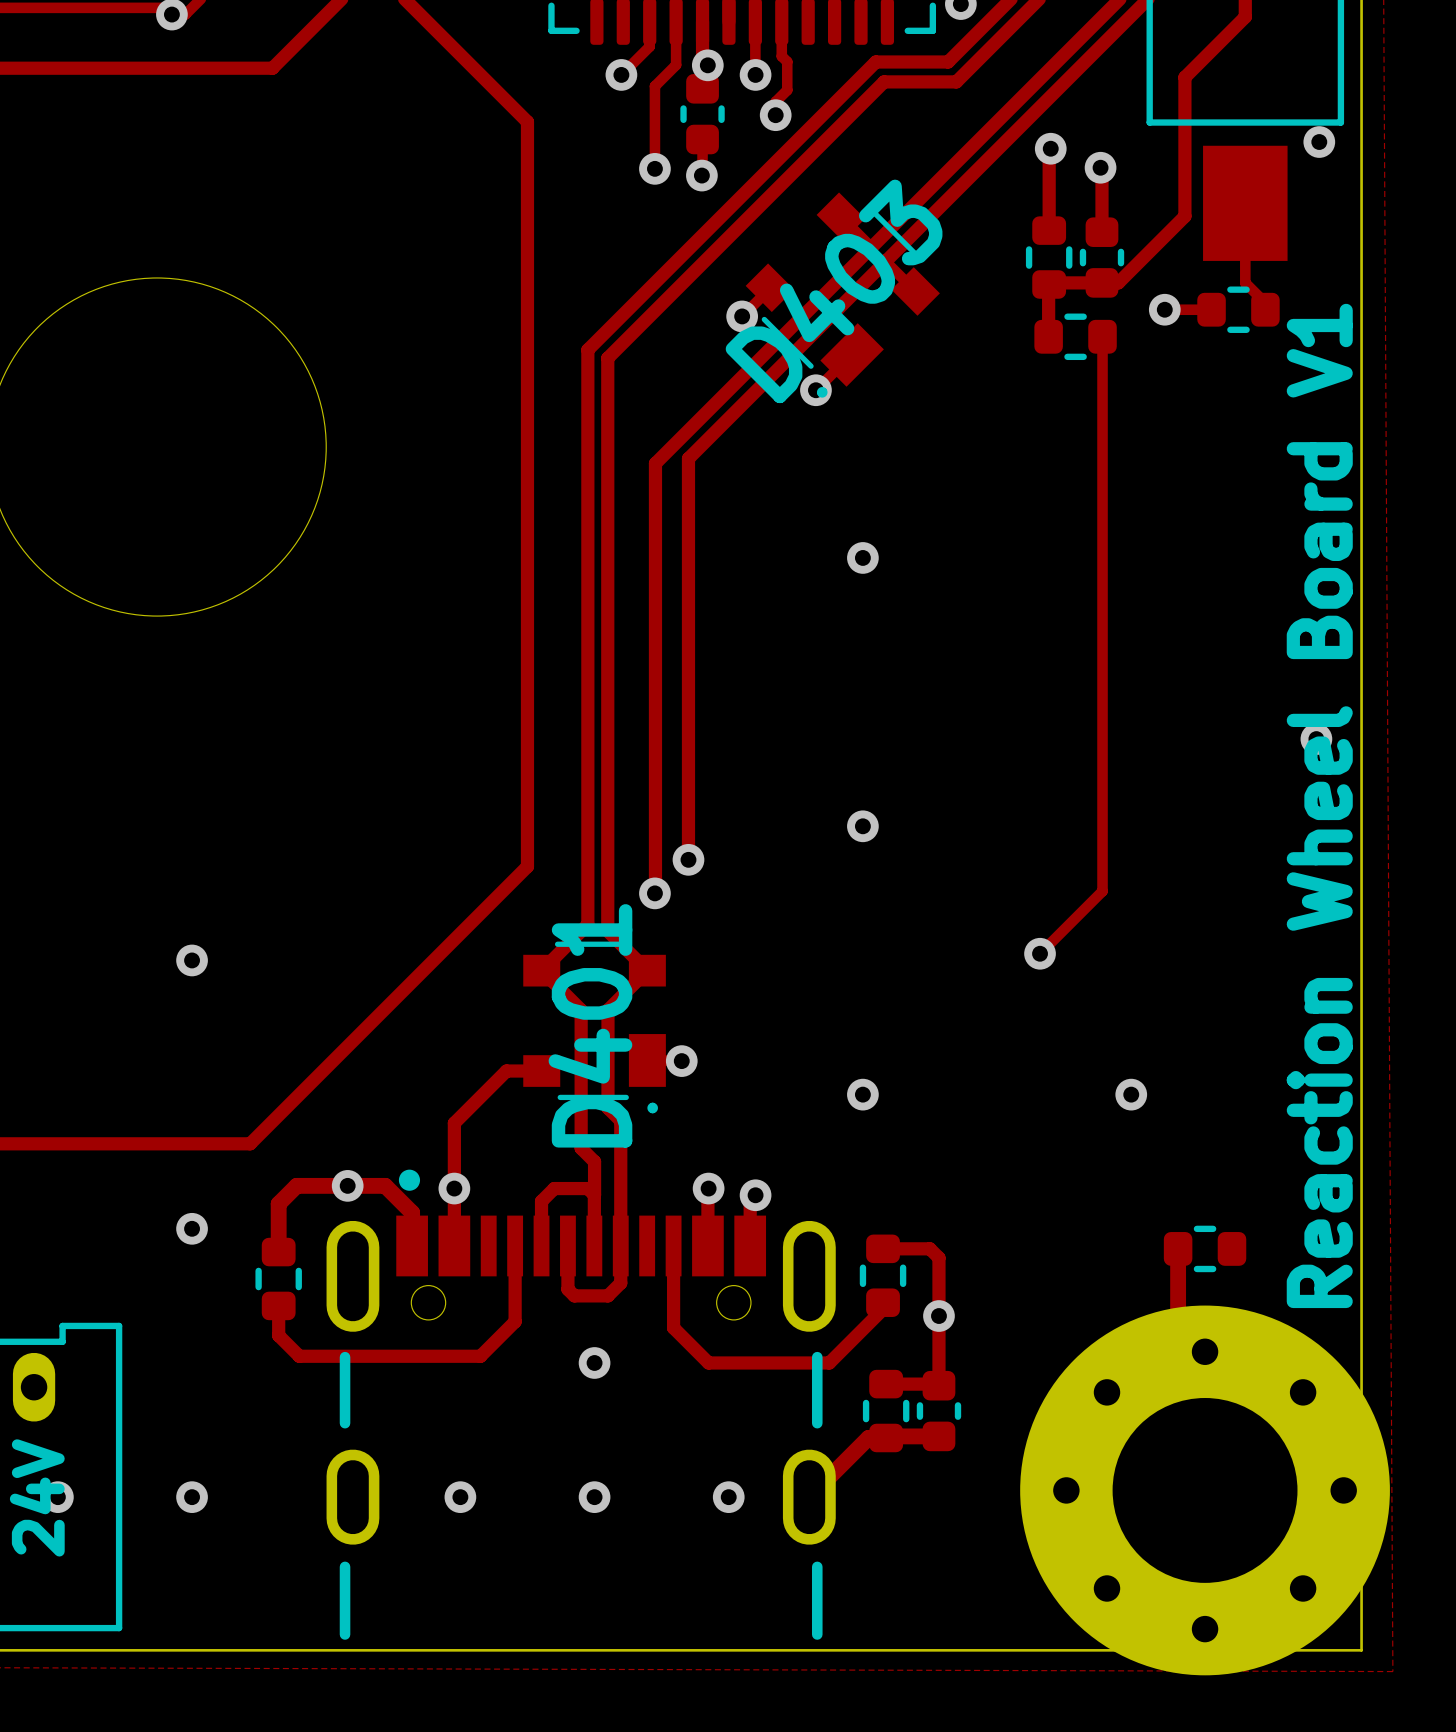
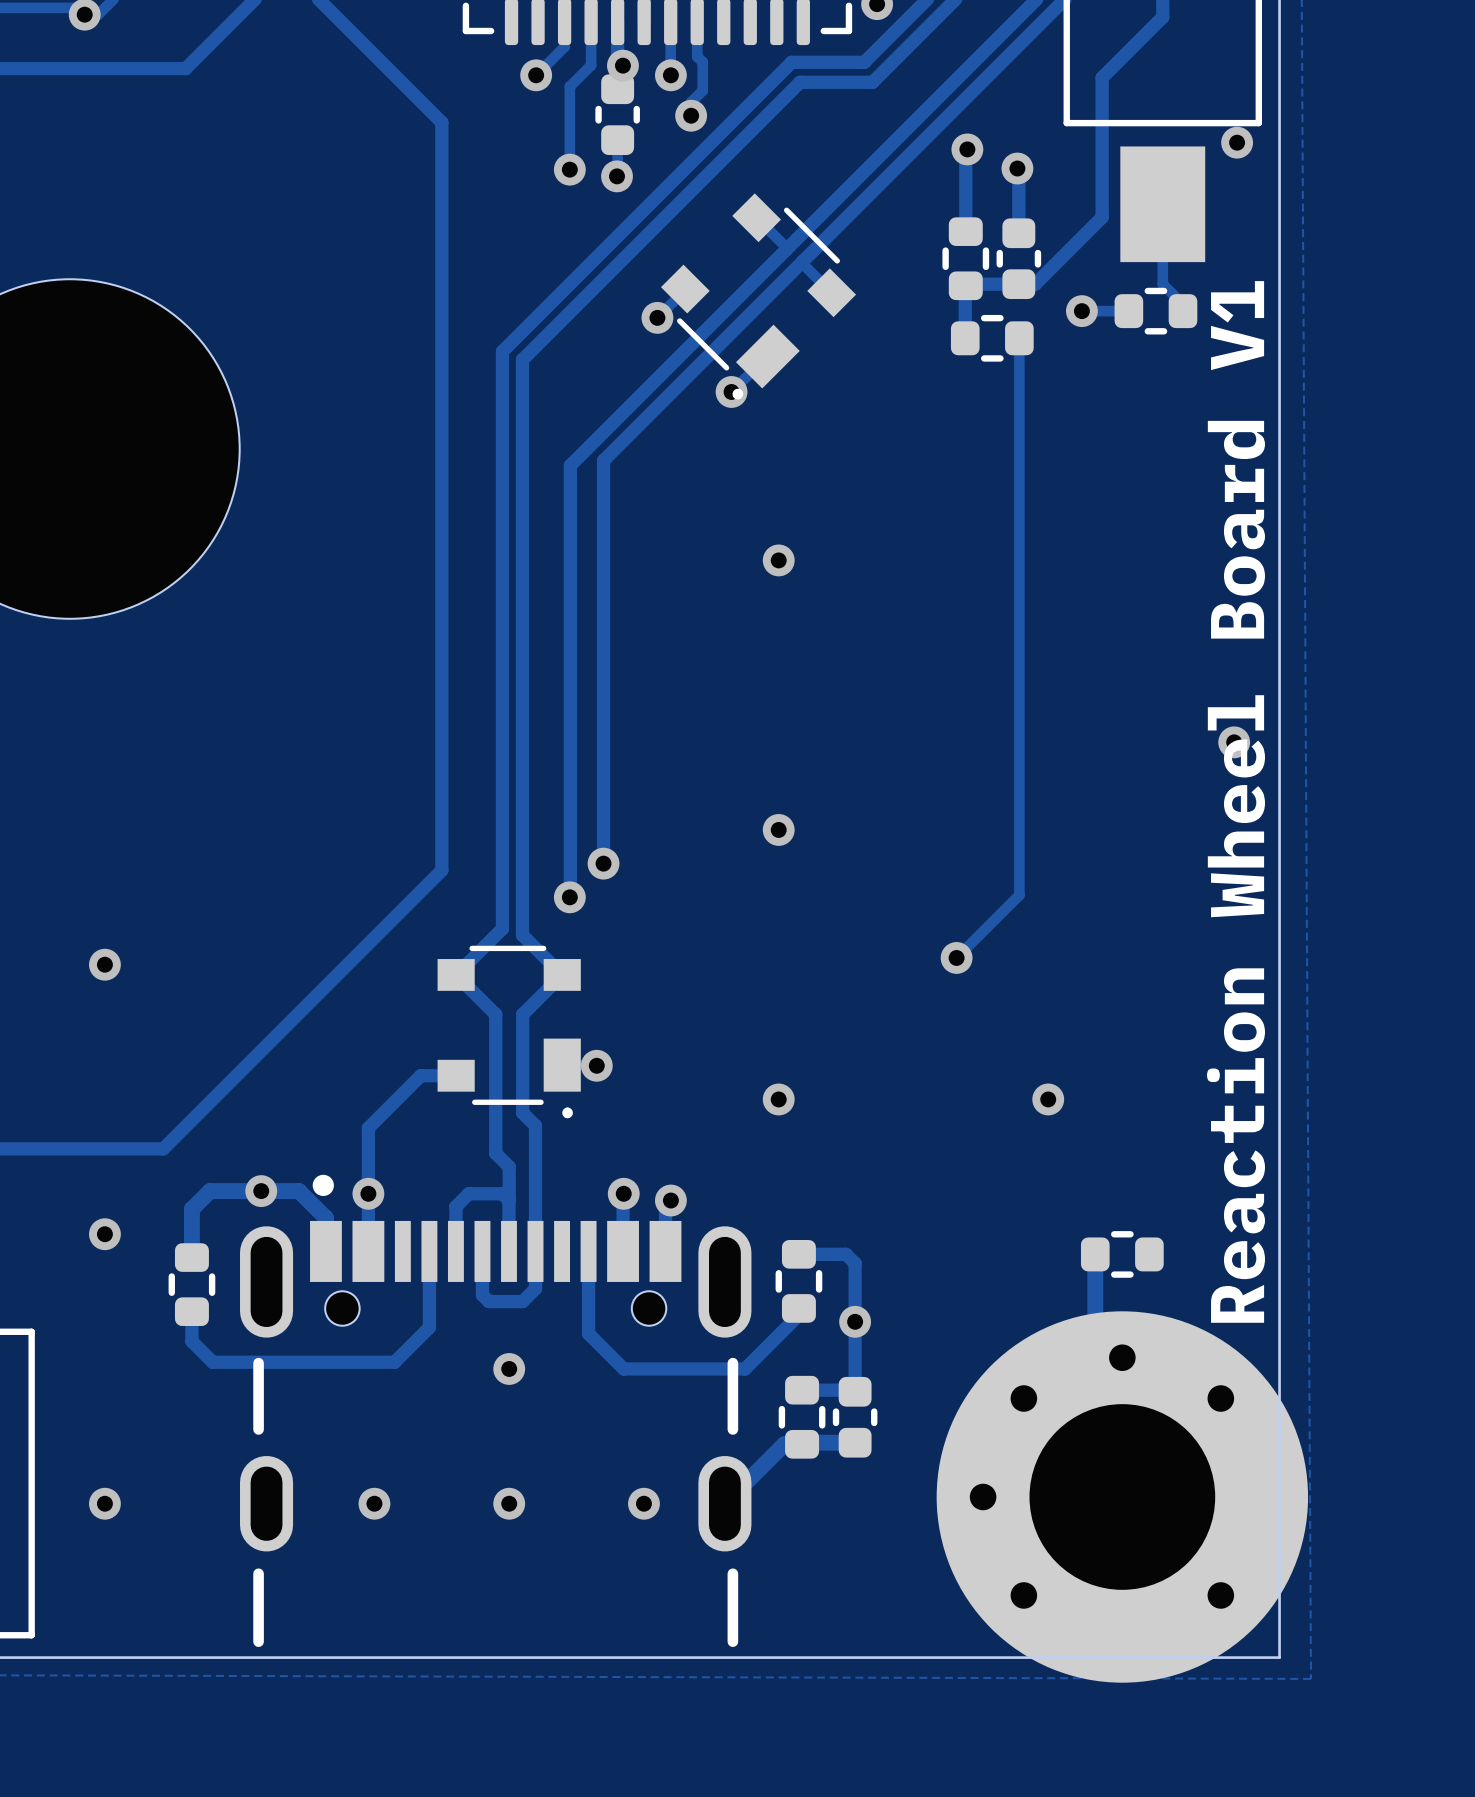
D403 name: D403 (834, 291) -> none
D401 name: D401 (590, 1025) -> none
part footprint: [1020, 1305, 1390, 1676] -> [936, 1311, 1309, 1683]

